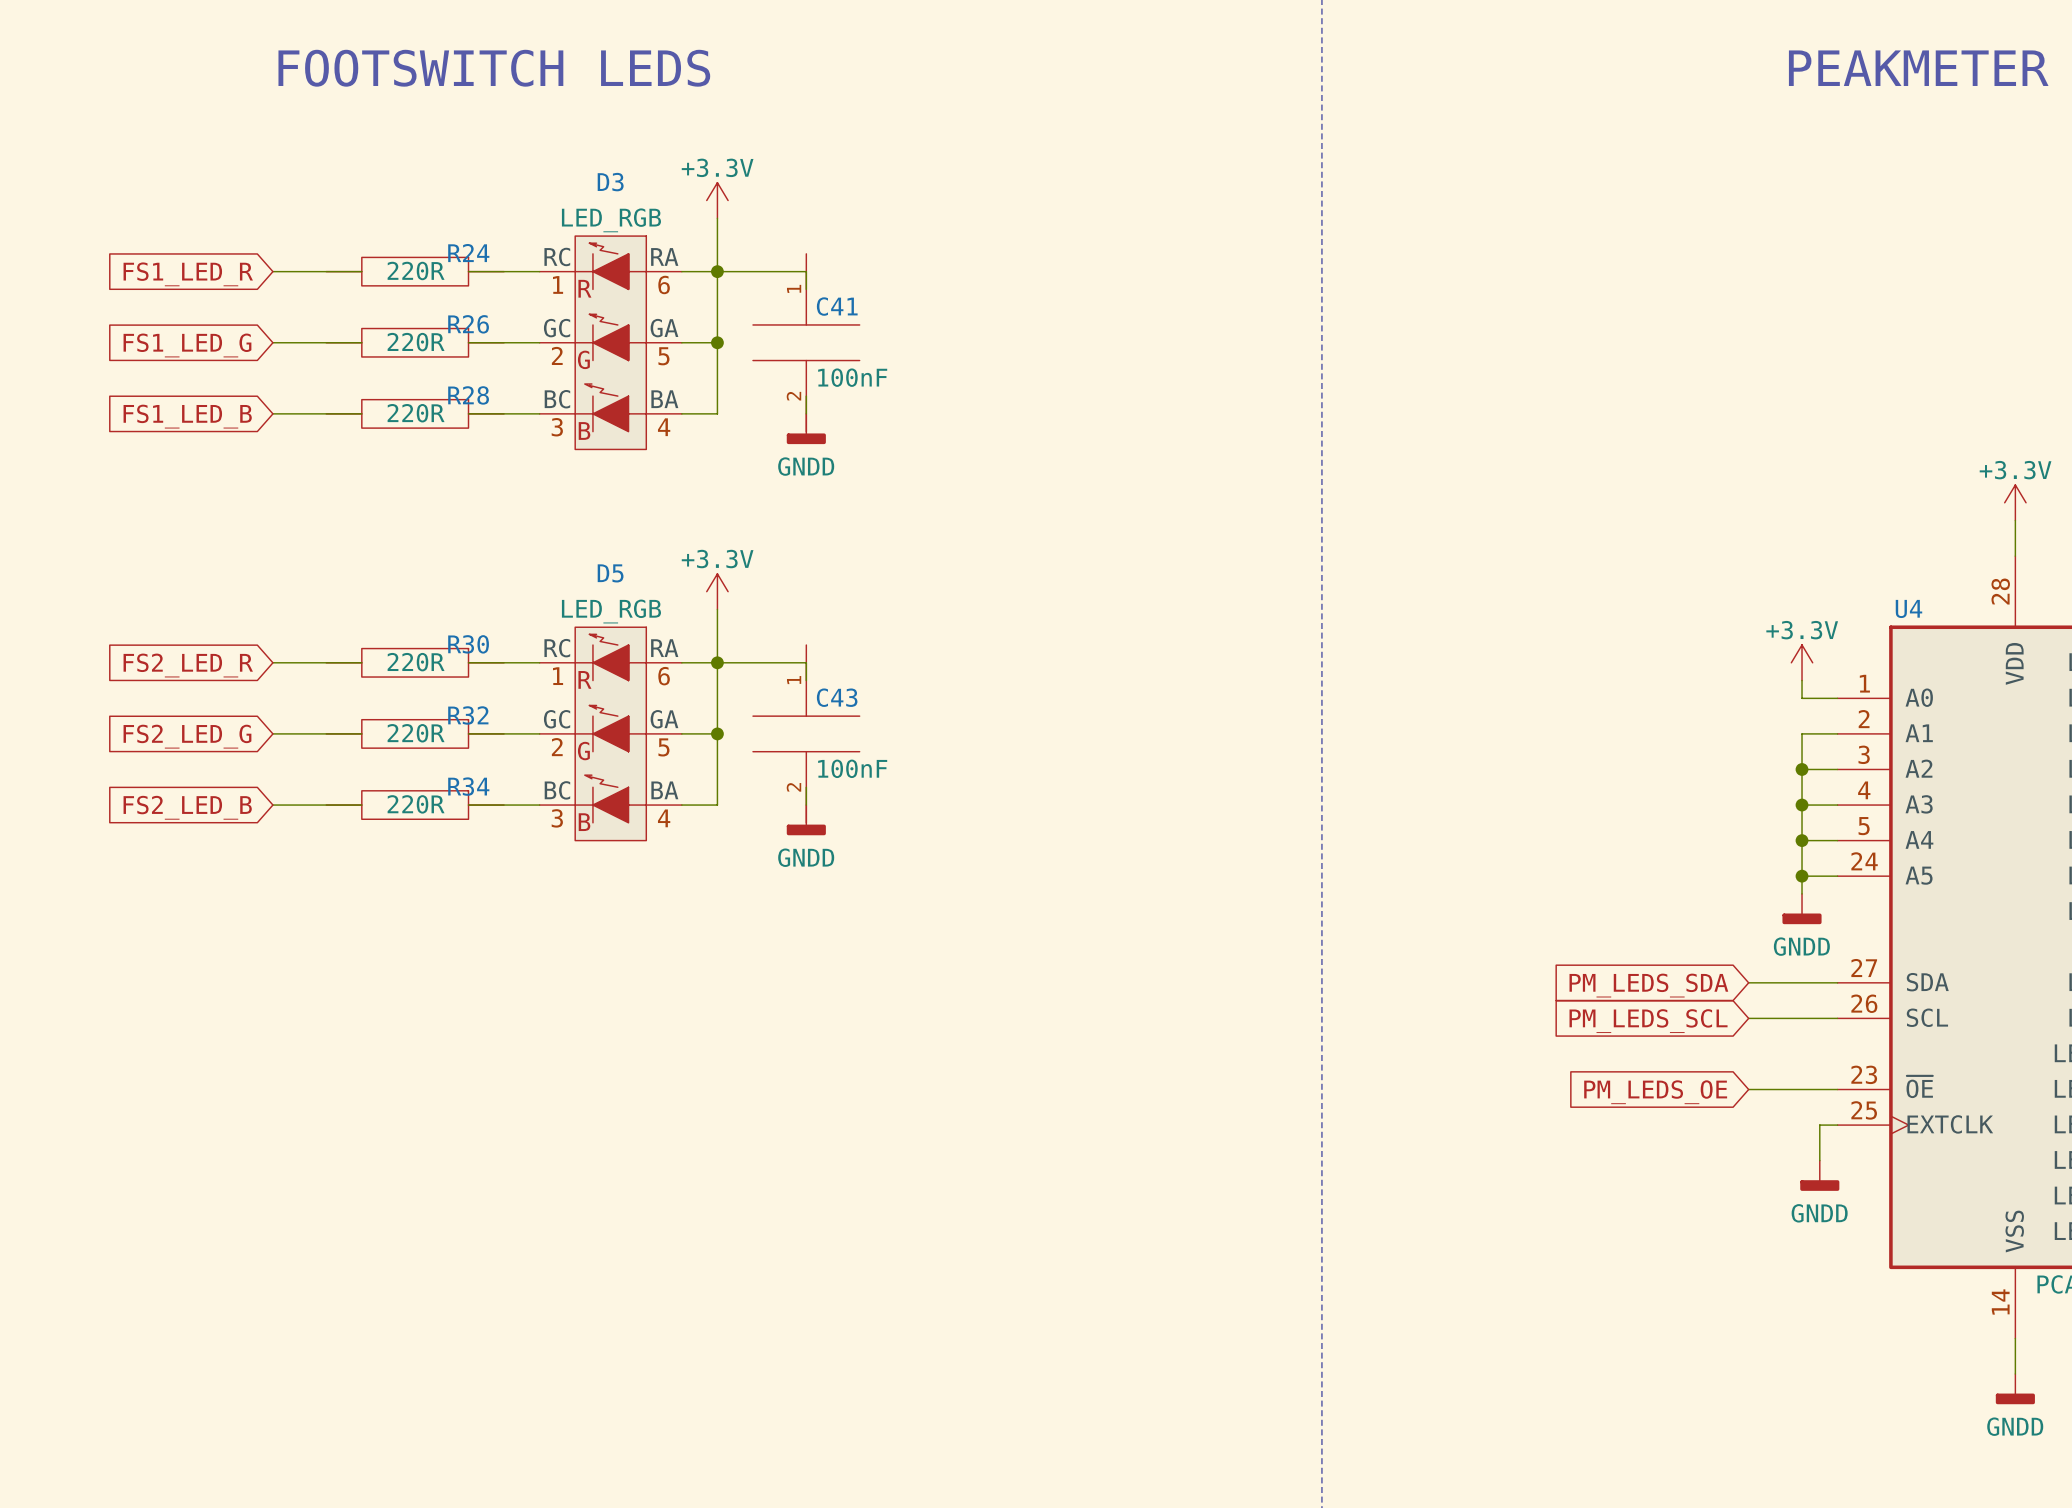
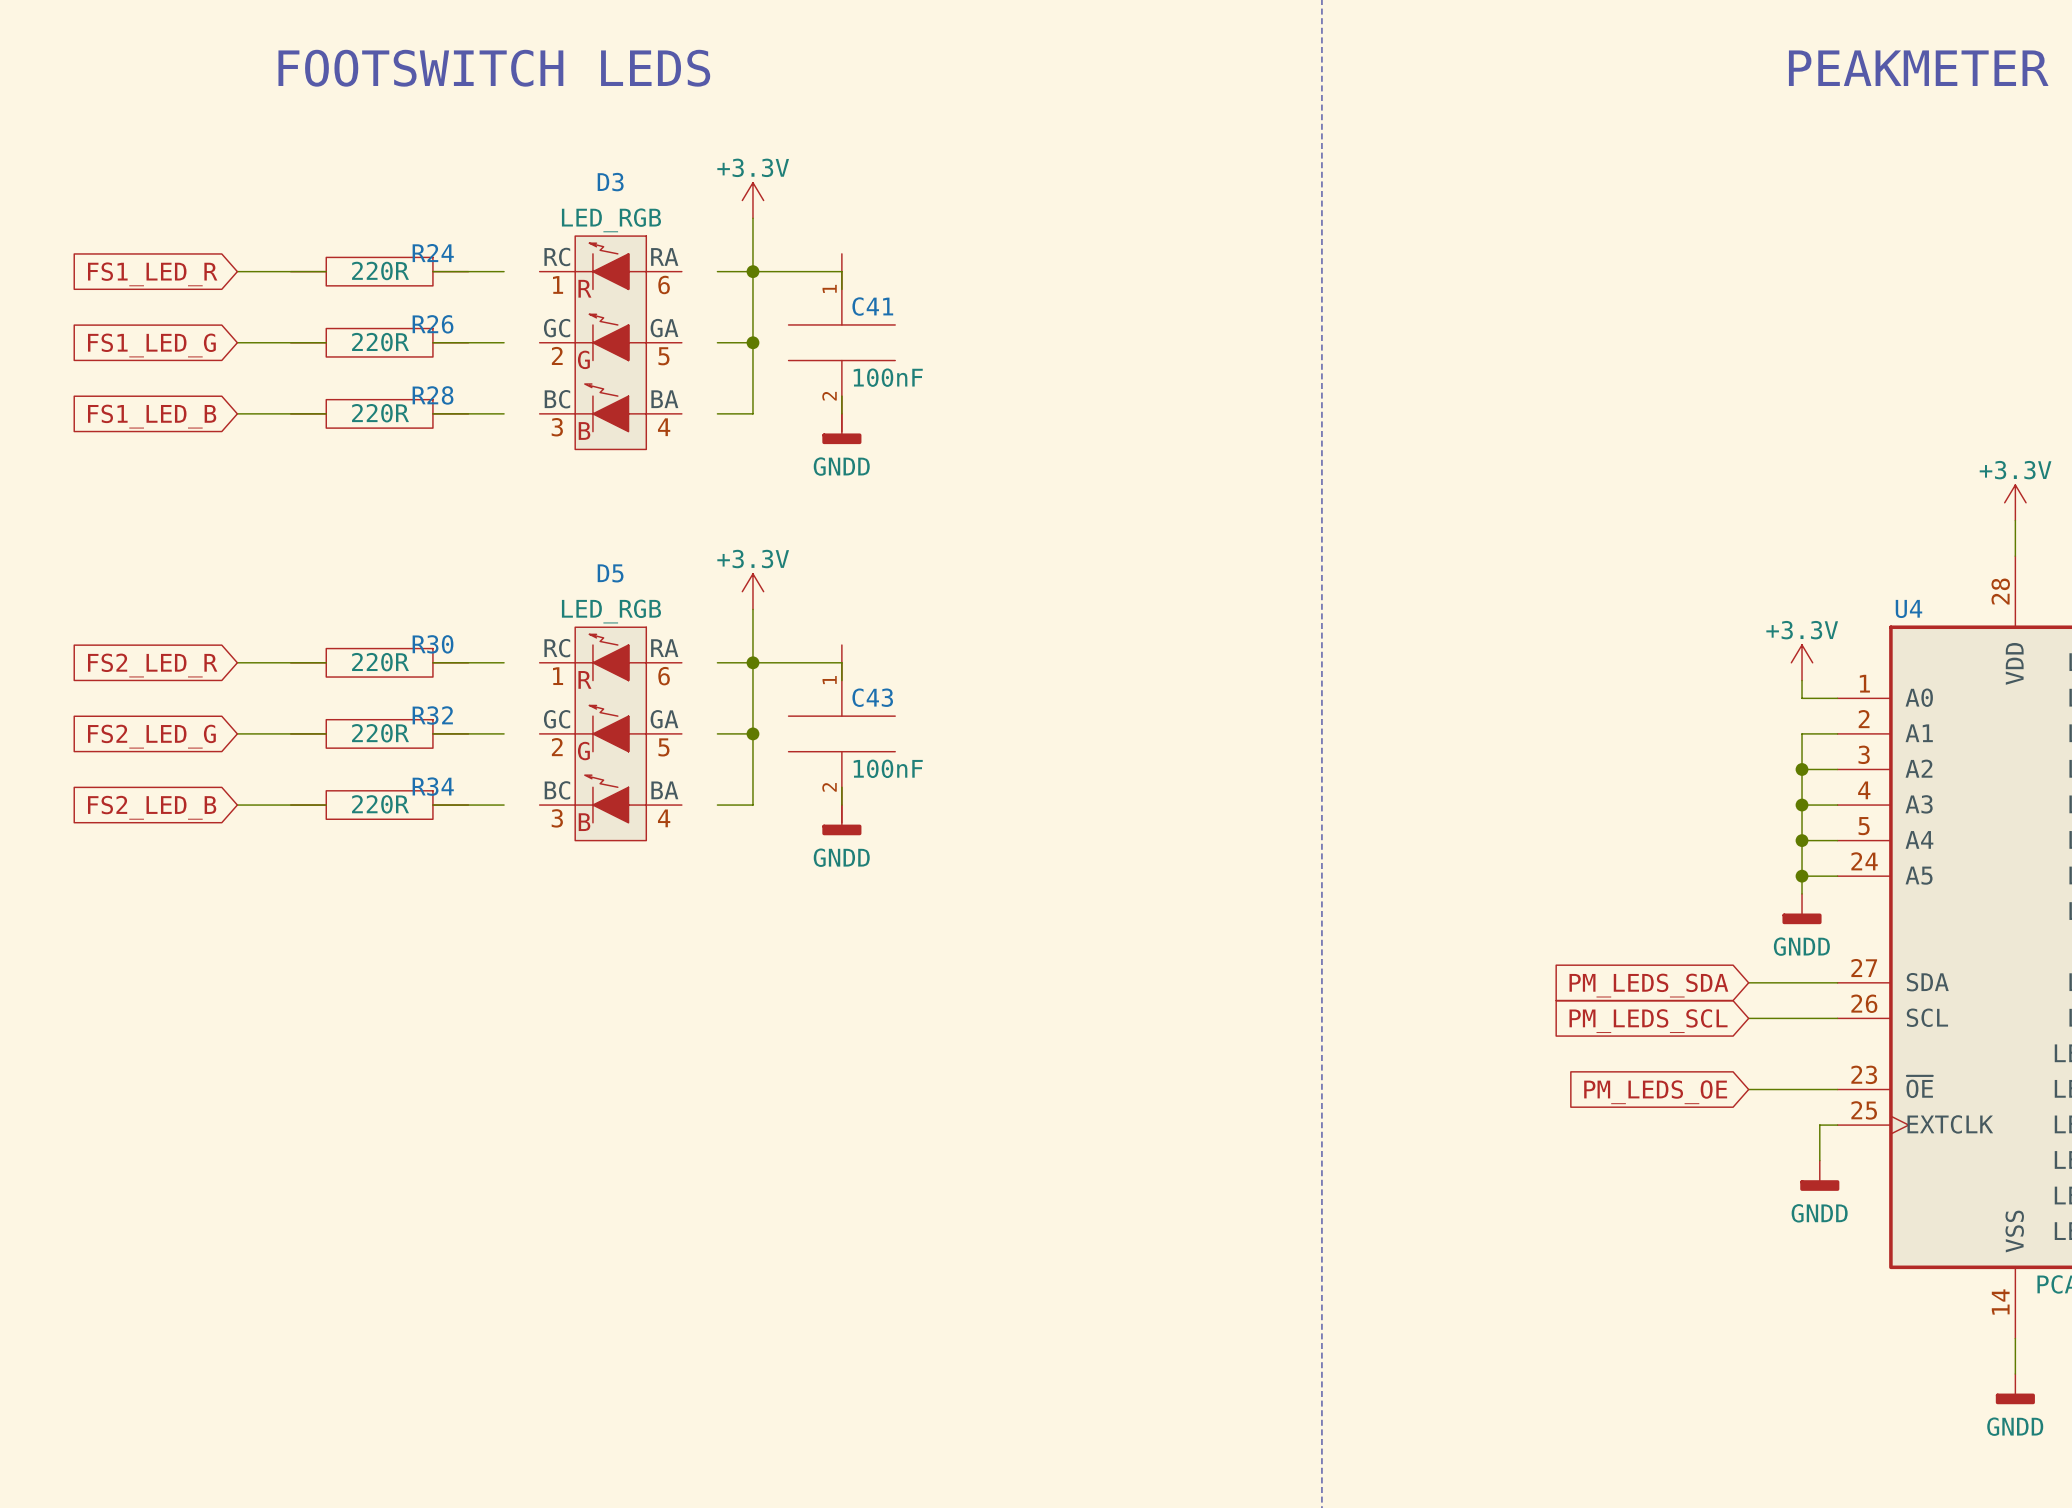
power symbol position: +3.3V (717, 200) -> +3.3V (752, 200)
wire: (717, 218) (717, 413) (681, 413) -> (752, 218) (752, 413) (717, 413)
wire: (326, 271) (361, 271) -> (237, 271) (272, 271)
R24 position: (415, 271) -> (379, 271)
wire: (504, 271) (539, 271) -> (432, 271) (468, 271)
wire: (681, 271) (717, 271) -> none
junction position: (717, 271) -> (752, 271)
wire: (806, 271) (806, 289) -> (806, 271) (841, 271) (841, 289)
global label position: FS1_LED_R (188, 274) -> FS1_LED_R (152, 274)
wire: (326, 342) (361, 342) -> (237, 342) (272, 342)
R26 position: (415, 342) -> (379, 342)
wire: (504, 342) (539, 342) -> (432, 342) (468, 342)
wire: (681, 342) (717, 342) -> (752, 342) (717, 342)
junction position: (717, 342) -> (752, 342)
C41 position: (806, 342) -> (841, 342)
global label position: FS1_LED_G (187, 345) -> FS1_LED_G (151, 345)
wire: (806, 396) (806, 413) -> (841, 396) (841, 413)
wire: (326, 413) (361, 413) -> (237, 413) (272, 413)
R28 position: (415, 413) -> (379, 413)
wire: (504, 413) (539, 413) -> (432, 413) (468, 413)
global label position: FS1_LED_B (187, 416) -> FS1_LED_B (152, 416)
power symbol position: GNDD (806, 428) -> GNDD (841, 428)
power symbol position: +3.3V (717, 591) -> +3.3V (752, 591)
wire: (717, 609) (717, 805) (681, 805) -> (752, 609) (752, 805) (717, 805)
wire: (326, 662) (361, 662) -> (237, 662) (272, 662)
R30 position: (415, 662) -> (379, 662)
wire: (504, 662) (539, 662) -> (432, 662) (468, 662)
wire: (681, 662) (717, 662) -> none
junction position: (717, 662) -> (752, 662)
wire: (806, 662) (806, 680) -> (806, 662) (841, 662) (841, 680)
global label position: FS2_LED_R (188, 665) -> FS2_LED_R (152, 665)
wire: (326, 733) (361, 733) -> (237, 733) (272, 733)
R32 position: (415, 733) -> (379, 733)
wire: (504, 733) (539, 733) -> (432, 733) (468, 733)
wire: (681, 733) (717, 733) -> (752, 733) (717, 733)
junction position: (717, 733) -> (752, 733)
C43 position: (806, 733) -> (841, 733)
global label position: FS2_LED_G (187, 736) -> FS2_LED_G (151, 736)
wire: (806, 787) (806, 805) -> (841, 787) (841, 805)
wire: (326, 805) (361, 805) -> (237, 805) (272, 805)
R34 position: (415, 805) -> (379, 805)
wire: (504, 805) (539, 805) -> (432, 805) (468, 805)
global label position: FS2_LED_B (187, 807) -> FS2_LED_B (152, 807)
power symbol position: GNDD (806, 820) -> GNDD (841, 820)

